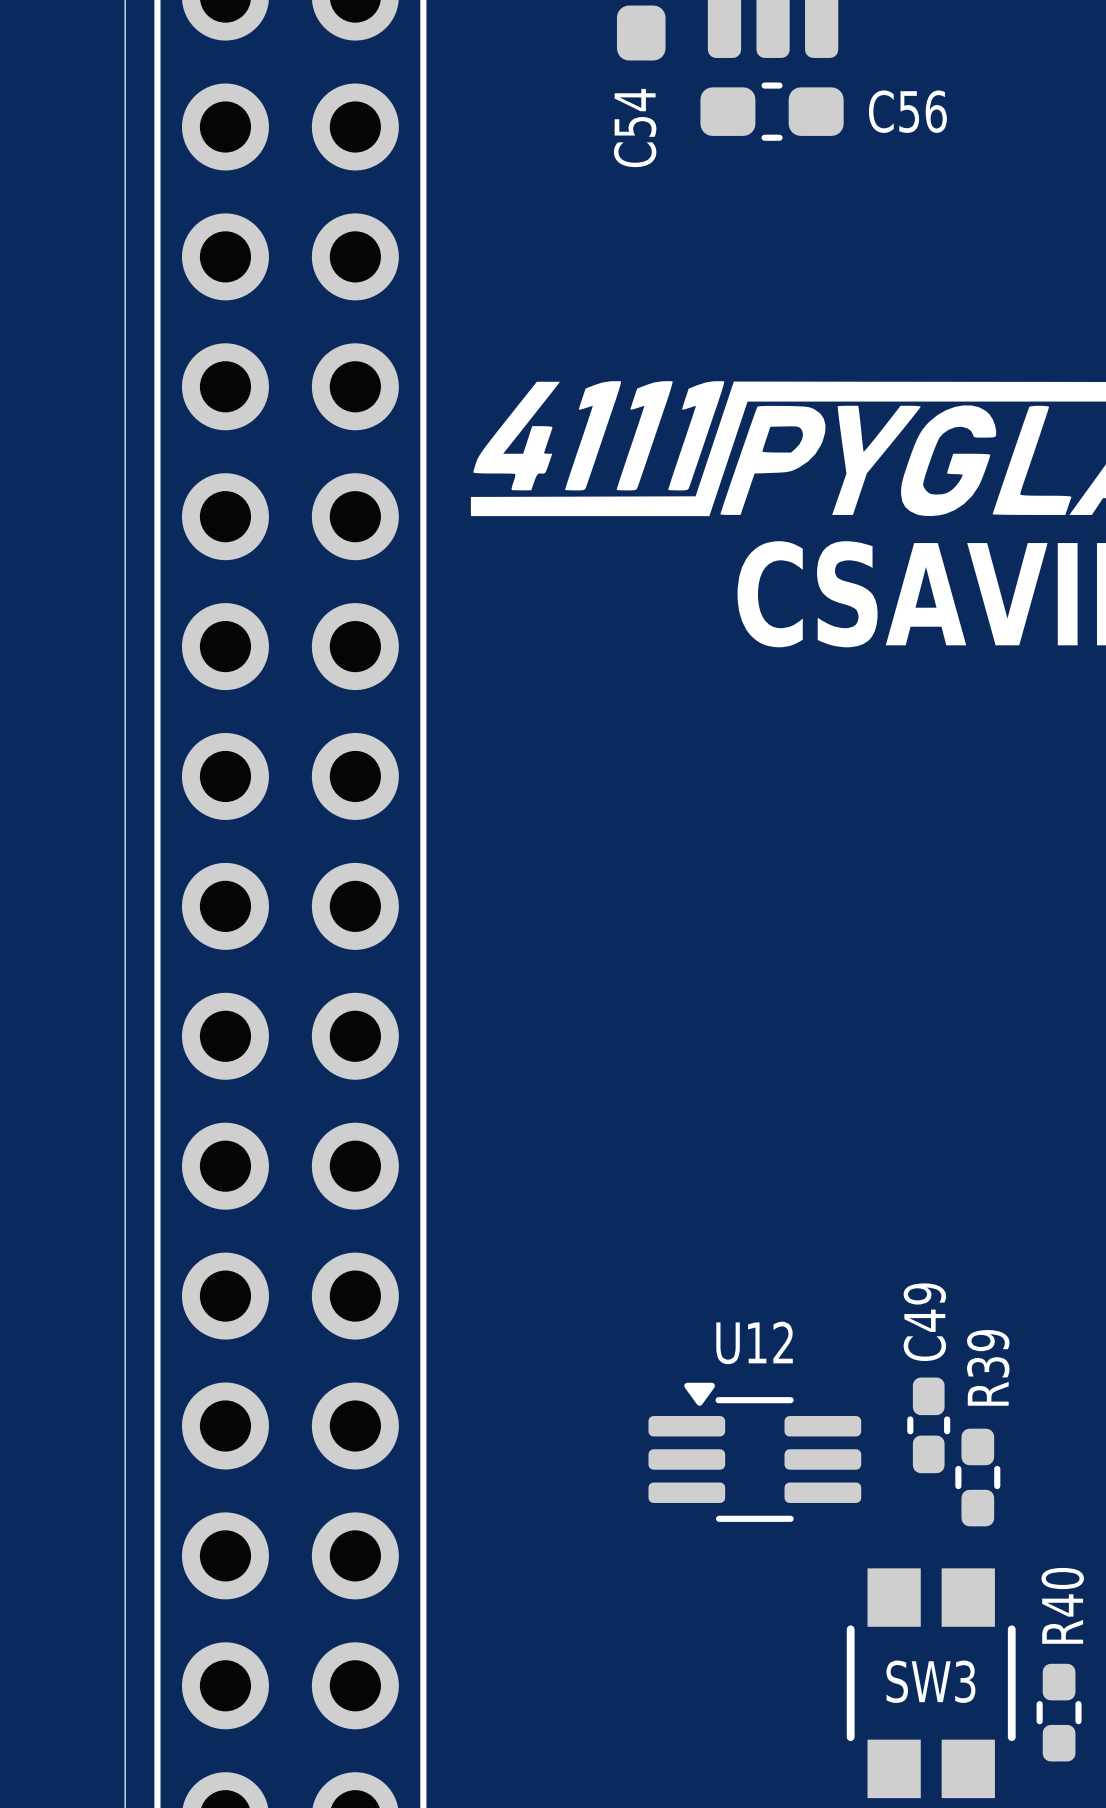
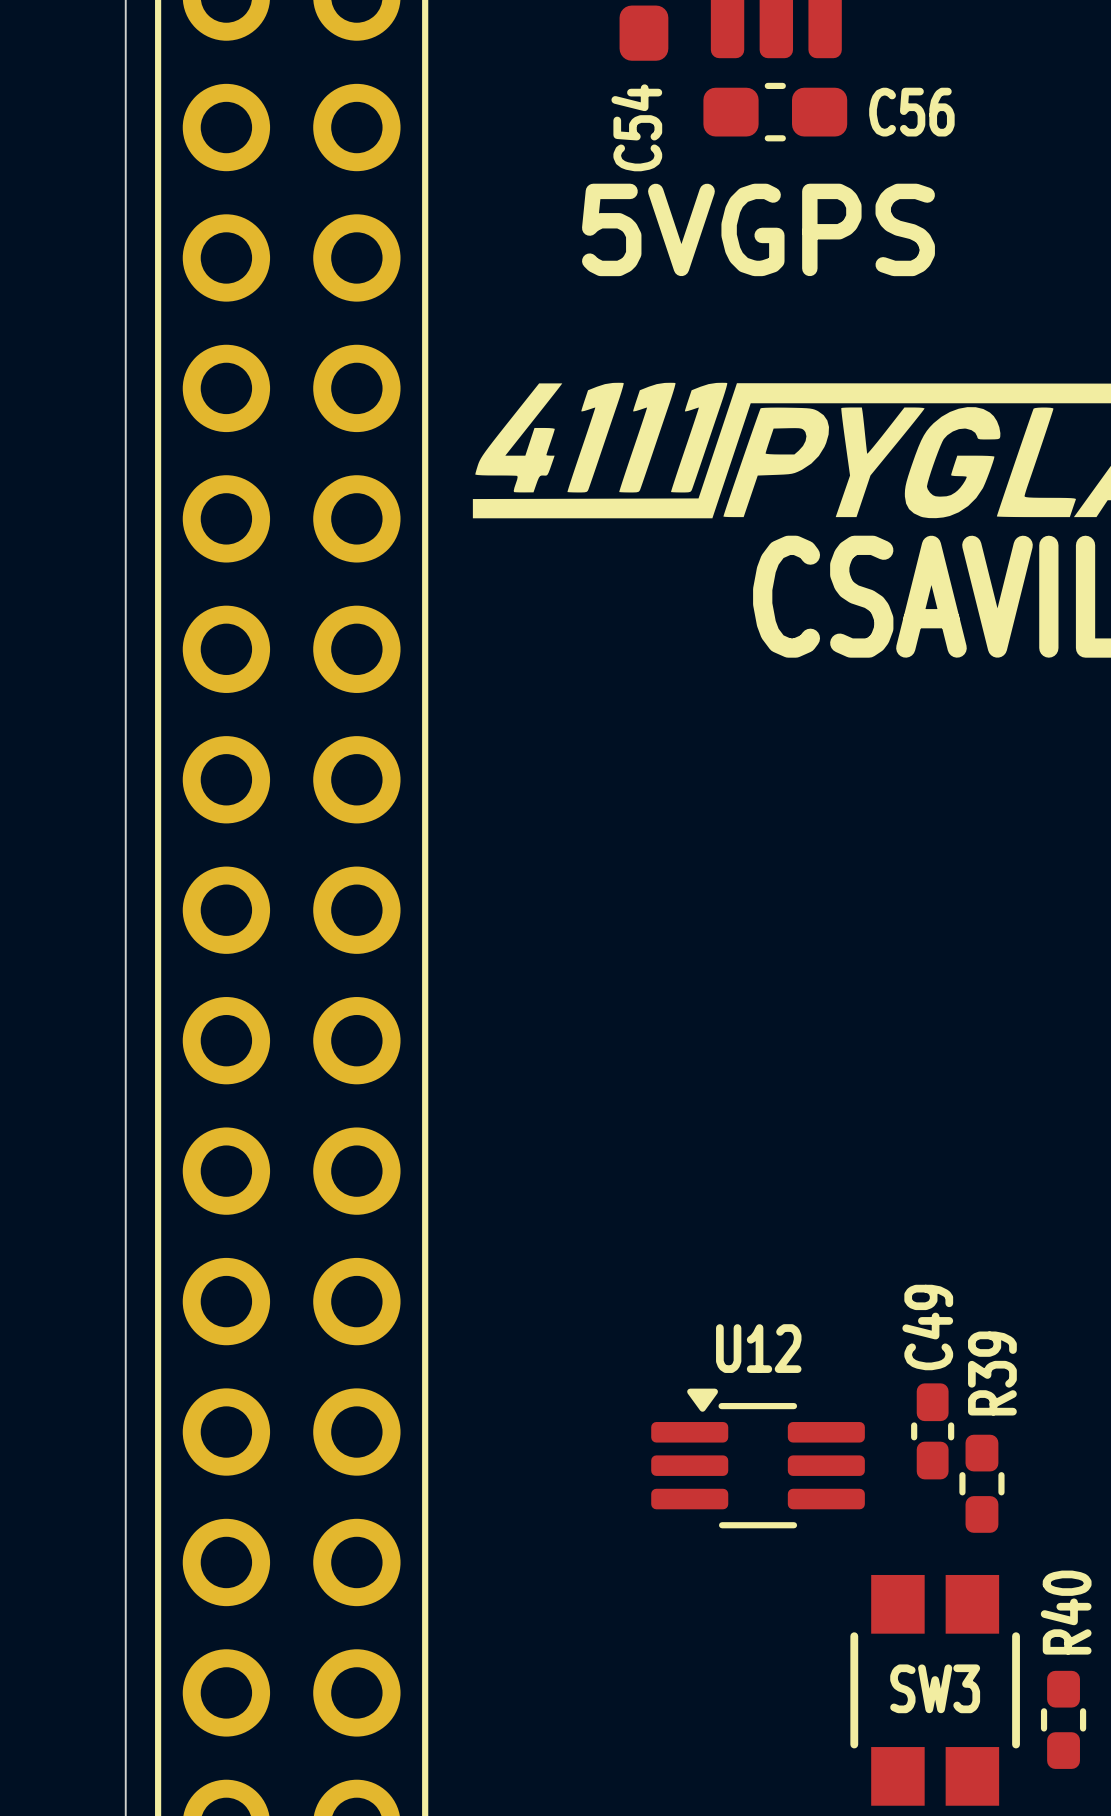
text: none -> 5VGPS (758, 229)

